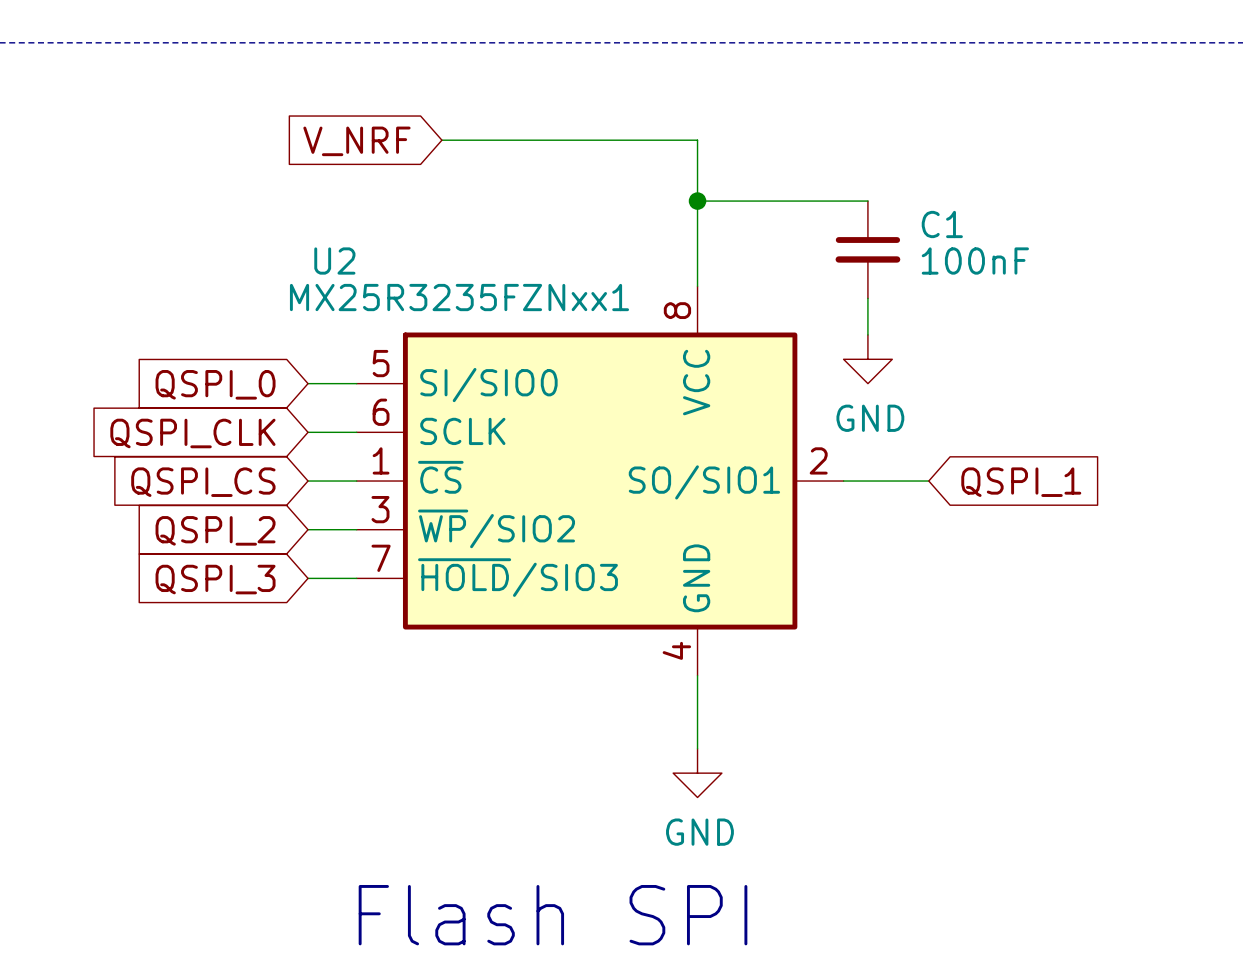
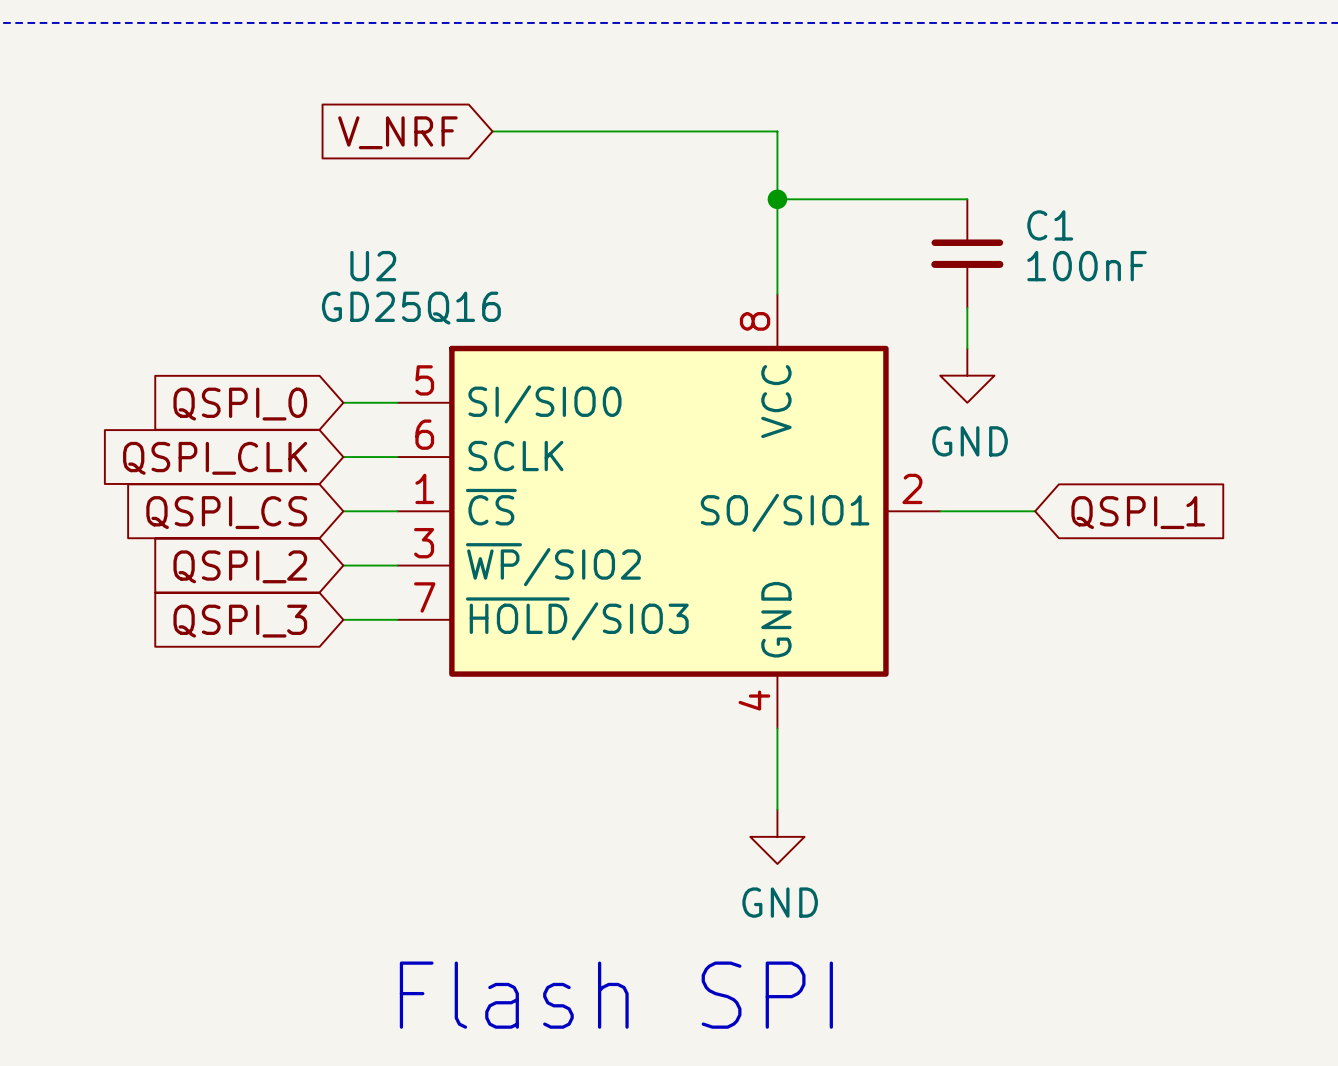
U2 value: MX25R3235FZNxx1 (459, 297) -> GD25Q16 (411, 308)

